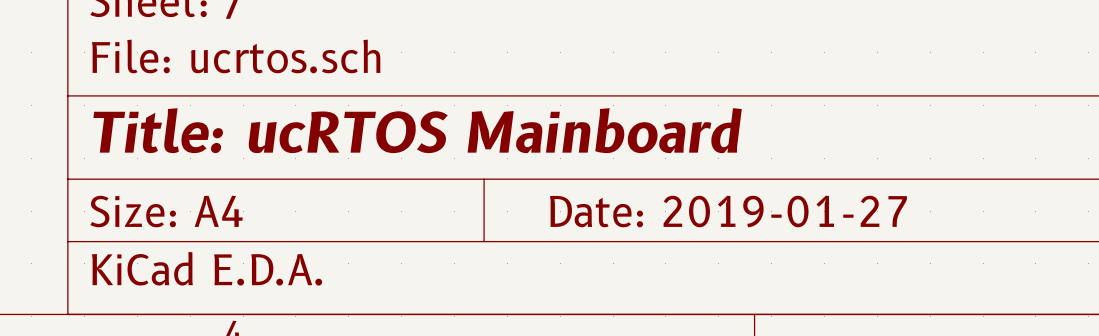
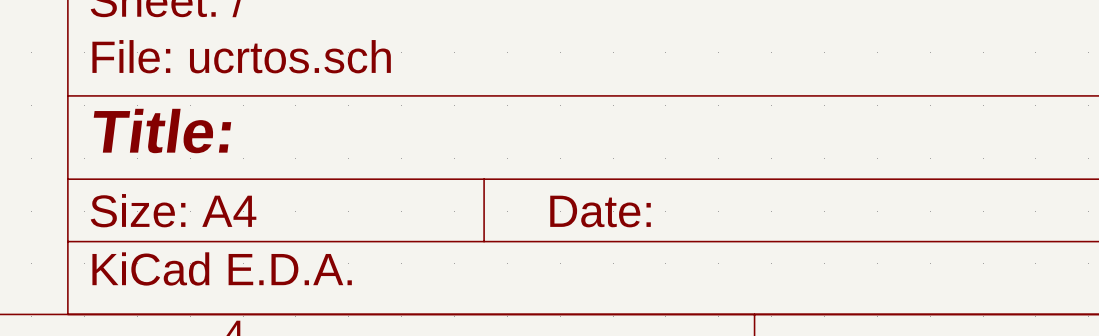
title block: Title: ucRTOS Mainboard (417, 130) -> Title: (162, 131)
title block: Date: 2019-01-27 (728, 211) -> Date: (600, 211)

